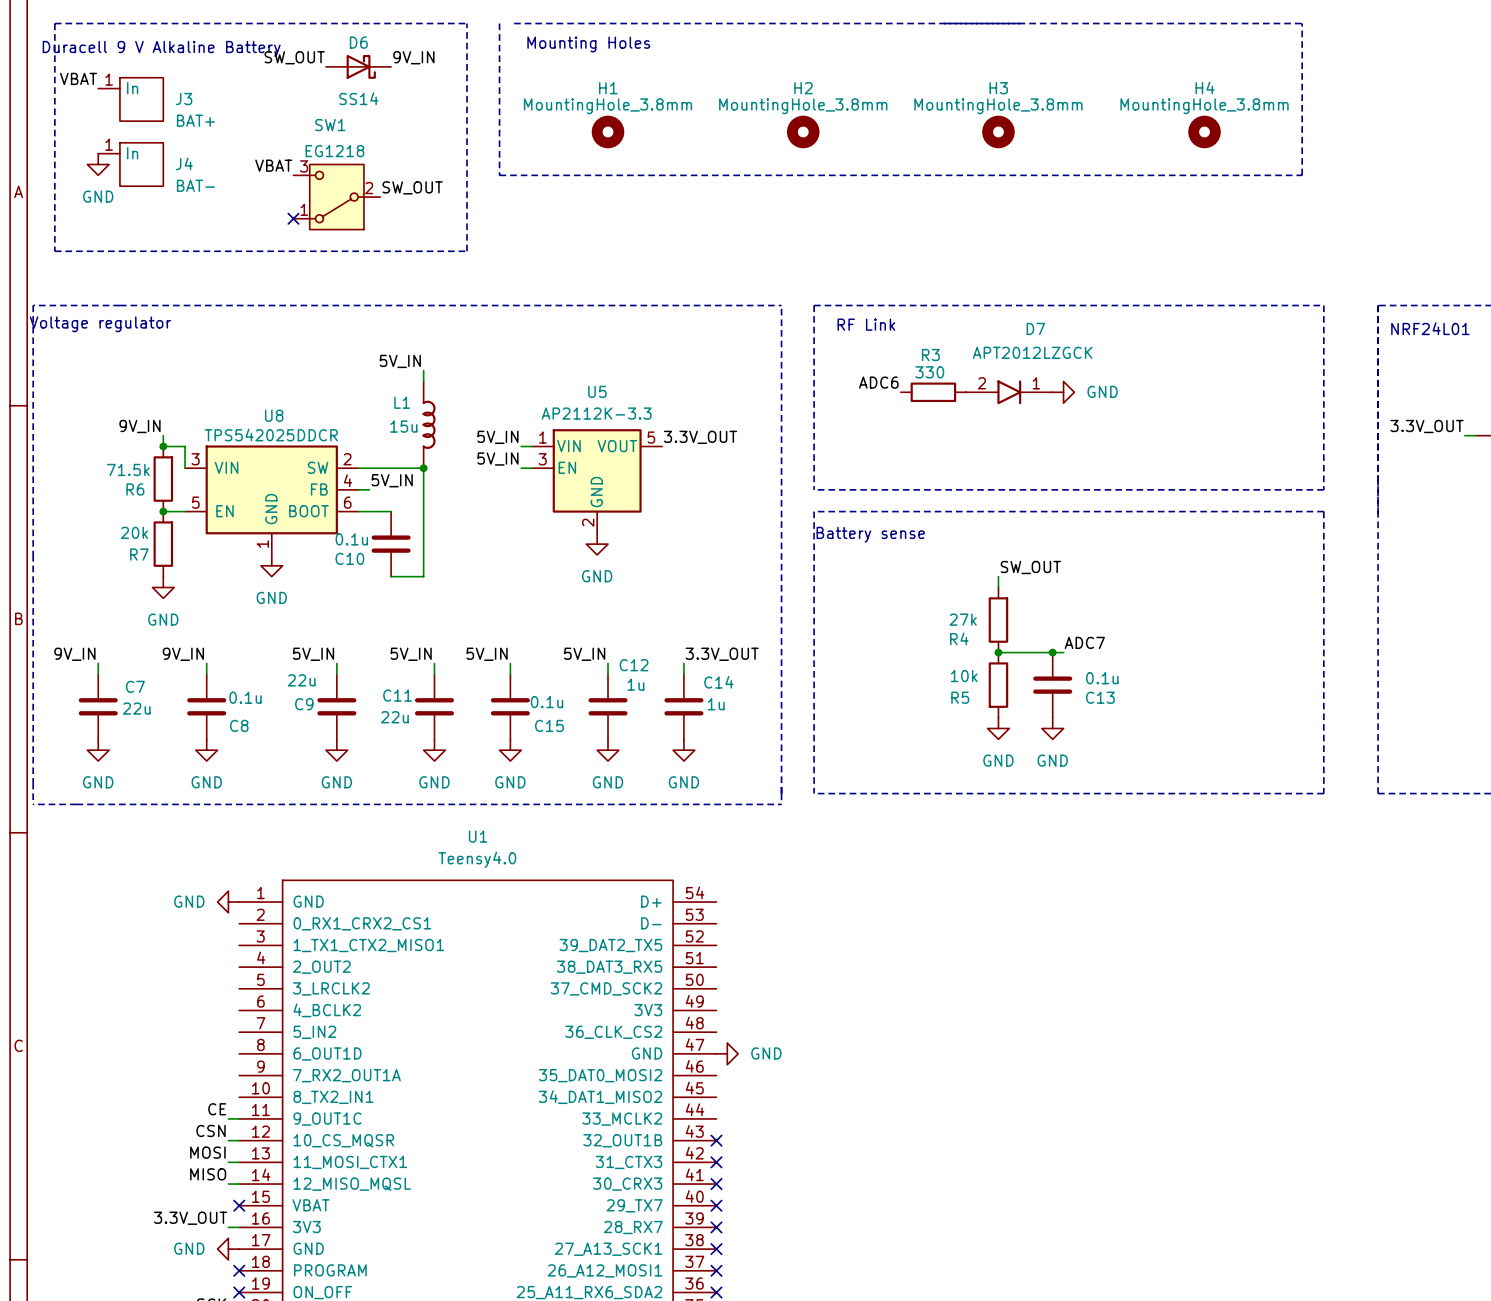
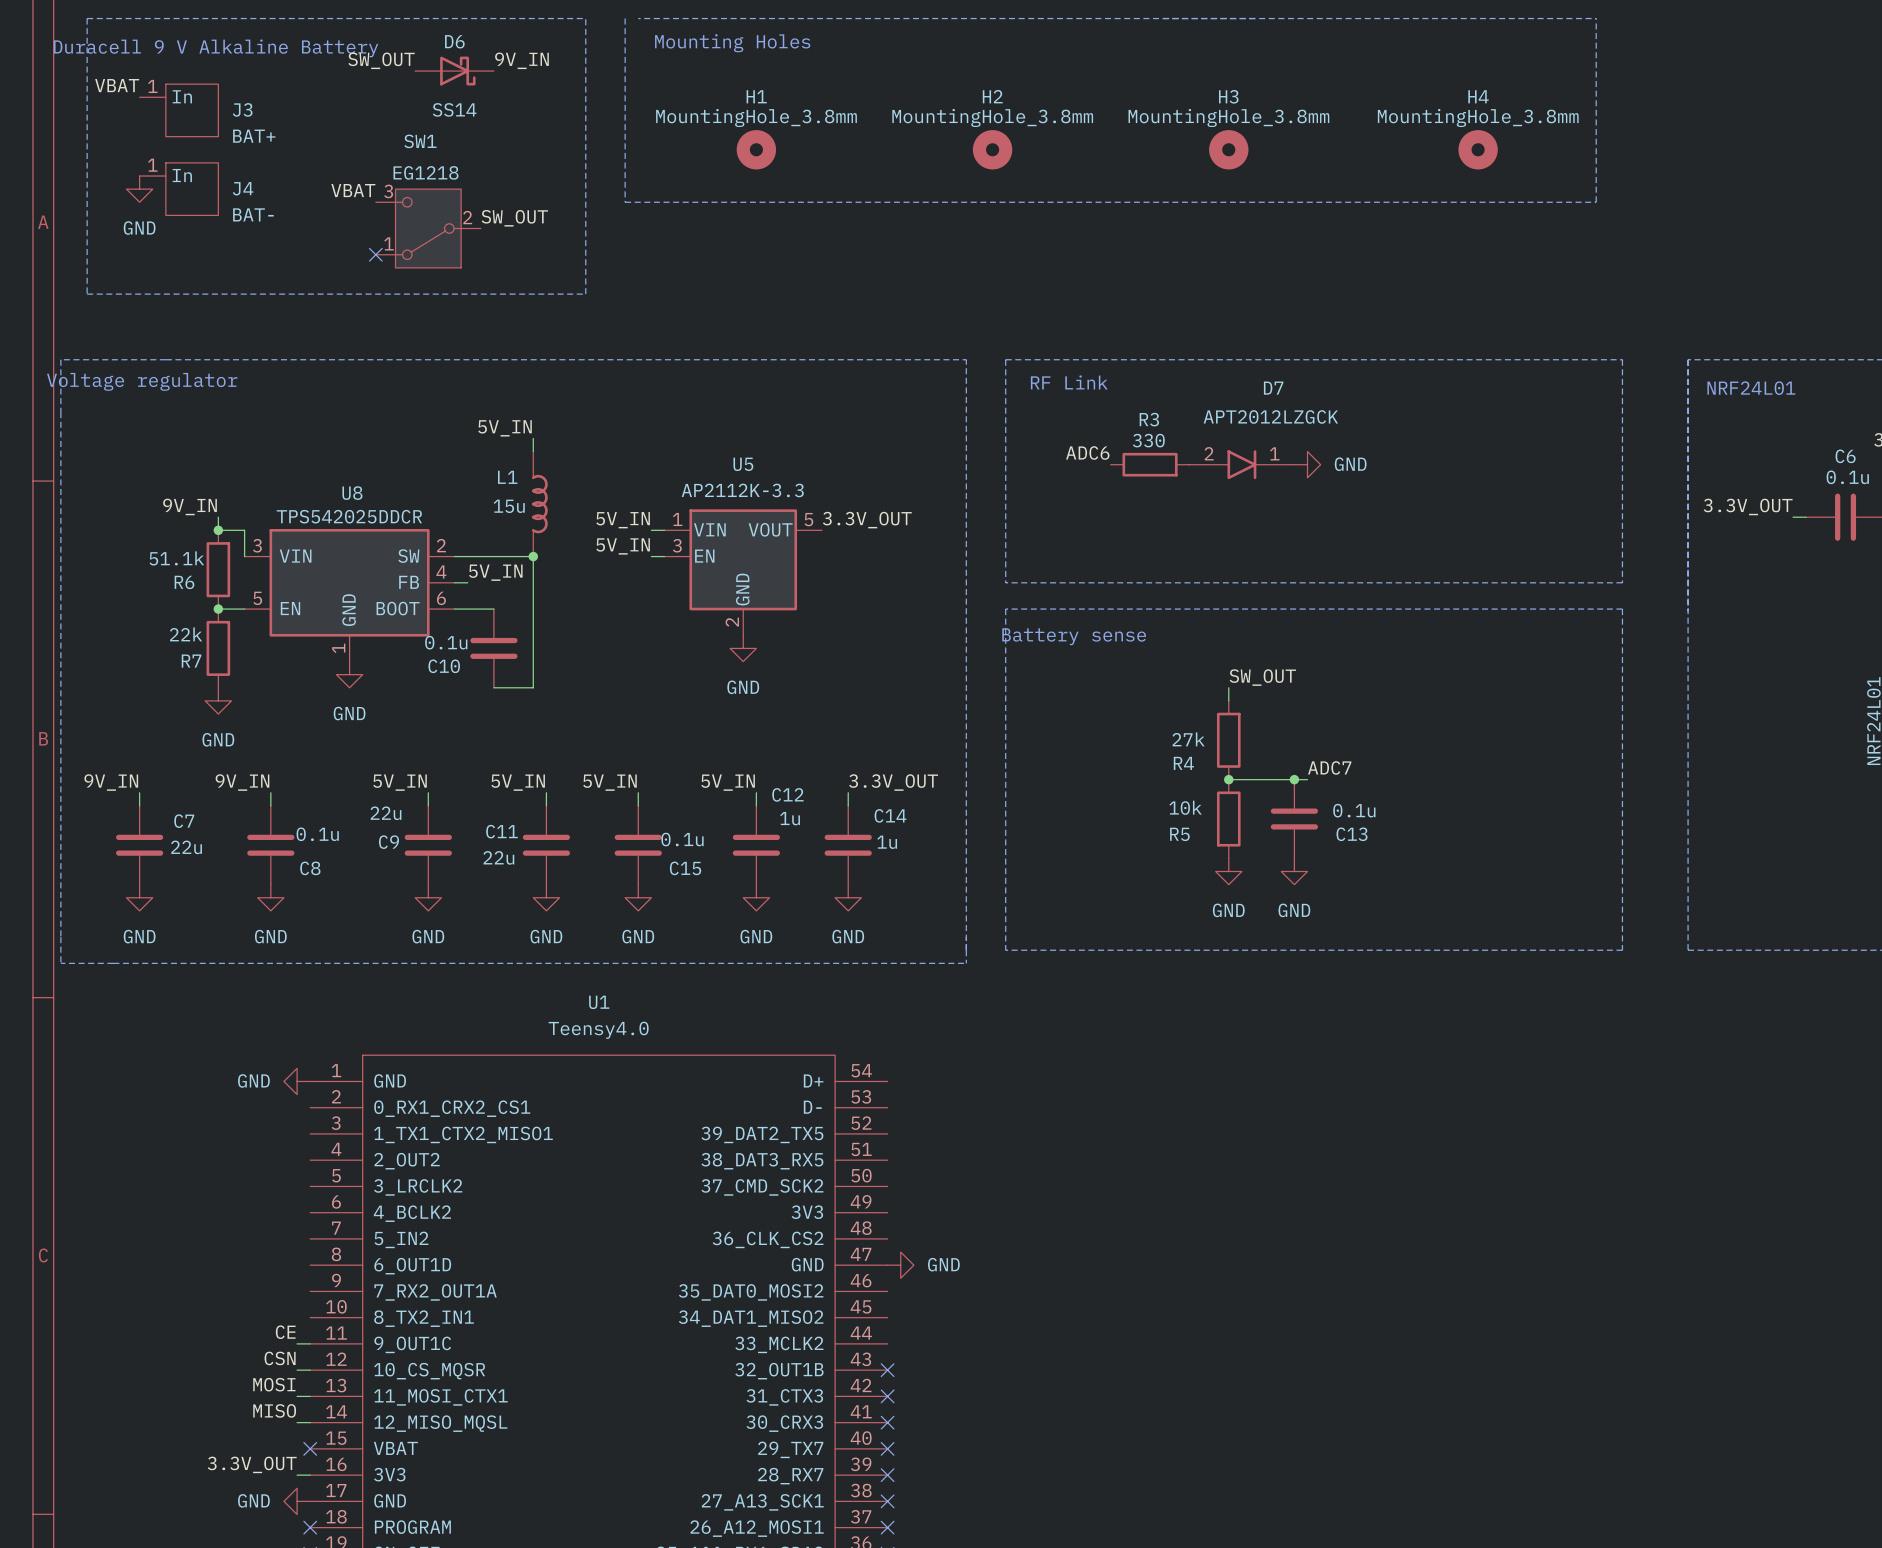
R6 value: 71.5k (128, 469) -> 51.1k (176, 558)
R7 value: 20k (134, 532) -> 22k (186, 634)

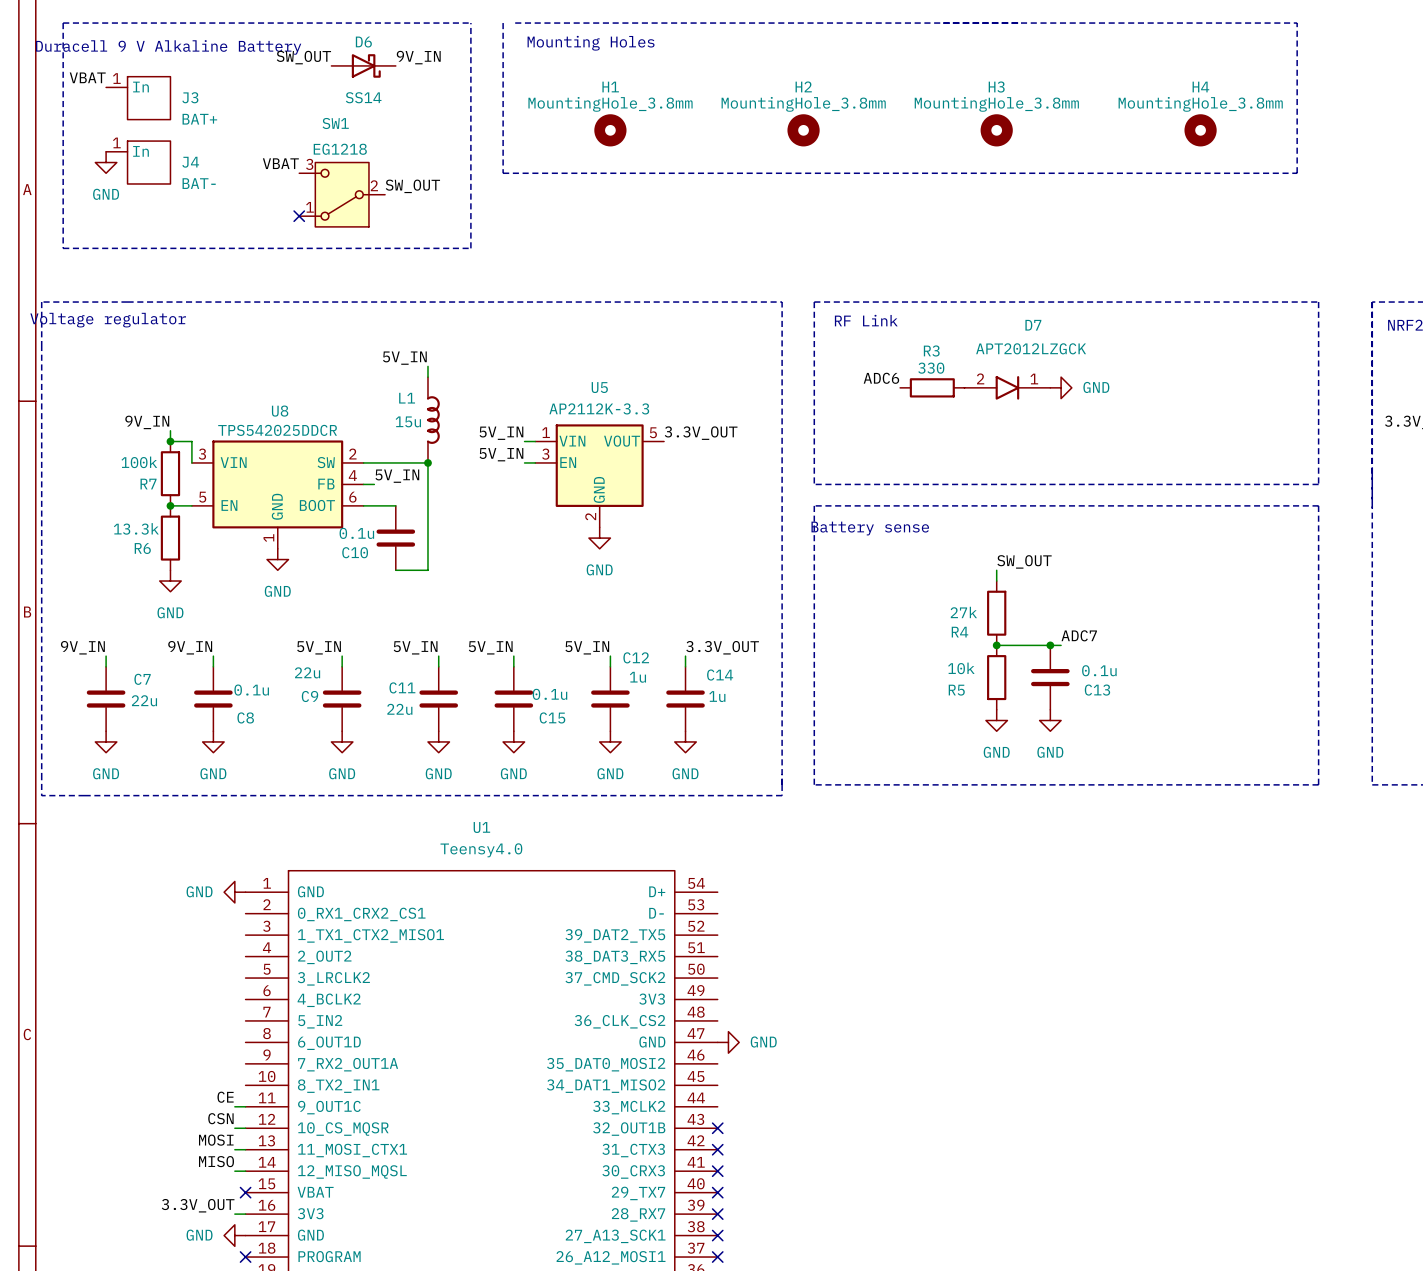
R6 value: 51.1k (176, 558) -> 100k (139, 462)
R6 name: R6 (184, 582) -> R7 (148, 484)
R7 value: 22k (186, 634) -> 13.3k (136, 528)
R7 name: R7 (191, 661) -> R6 (142, 548)

